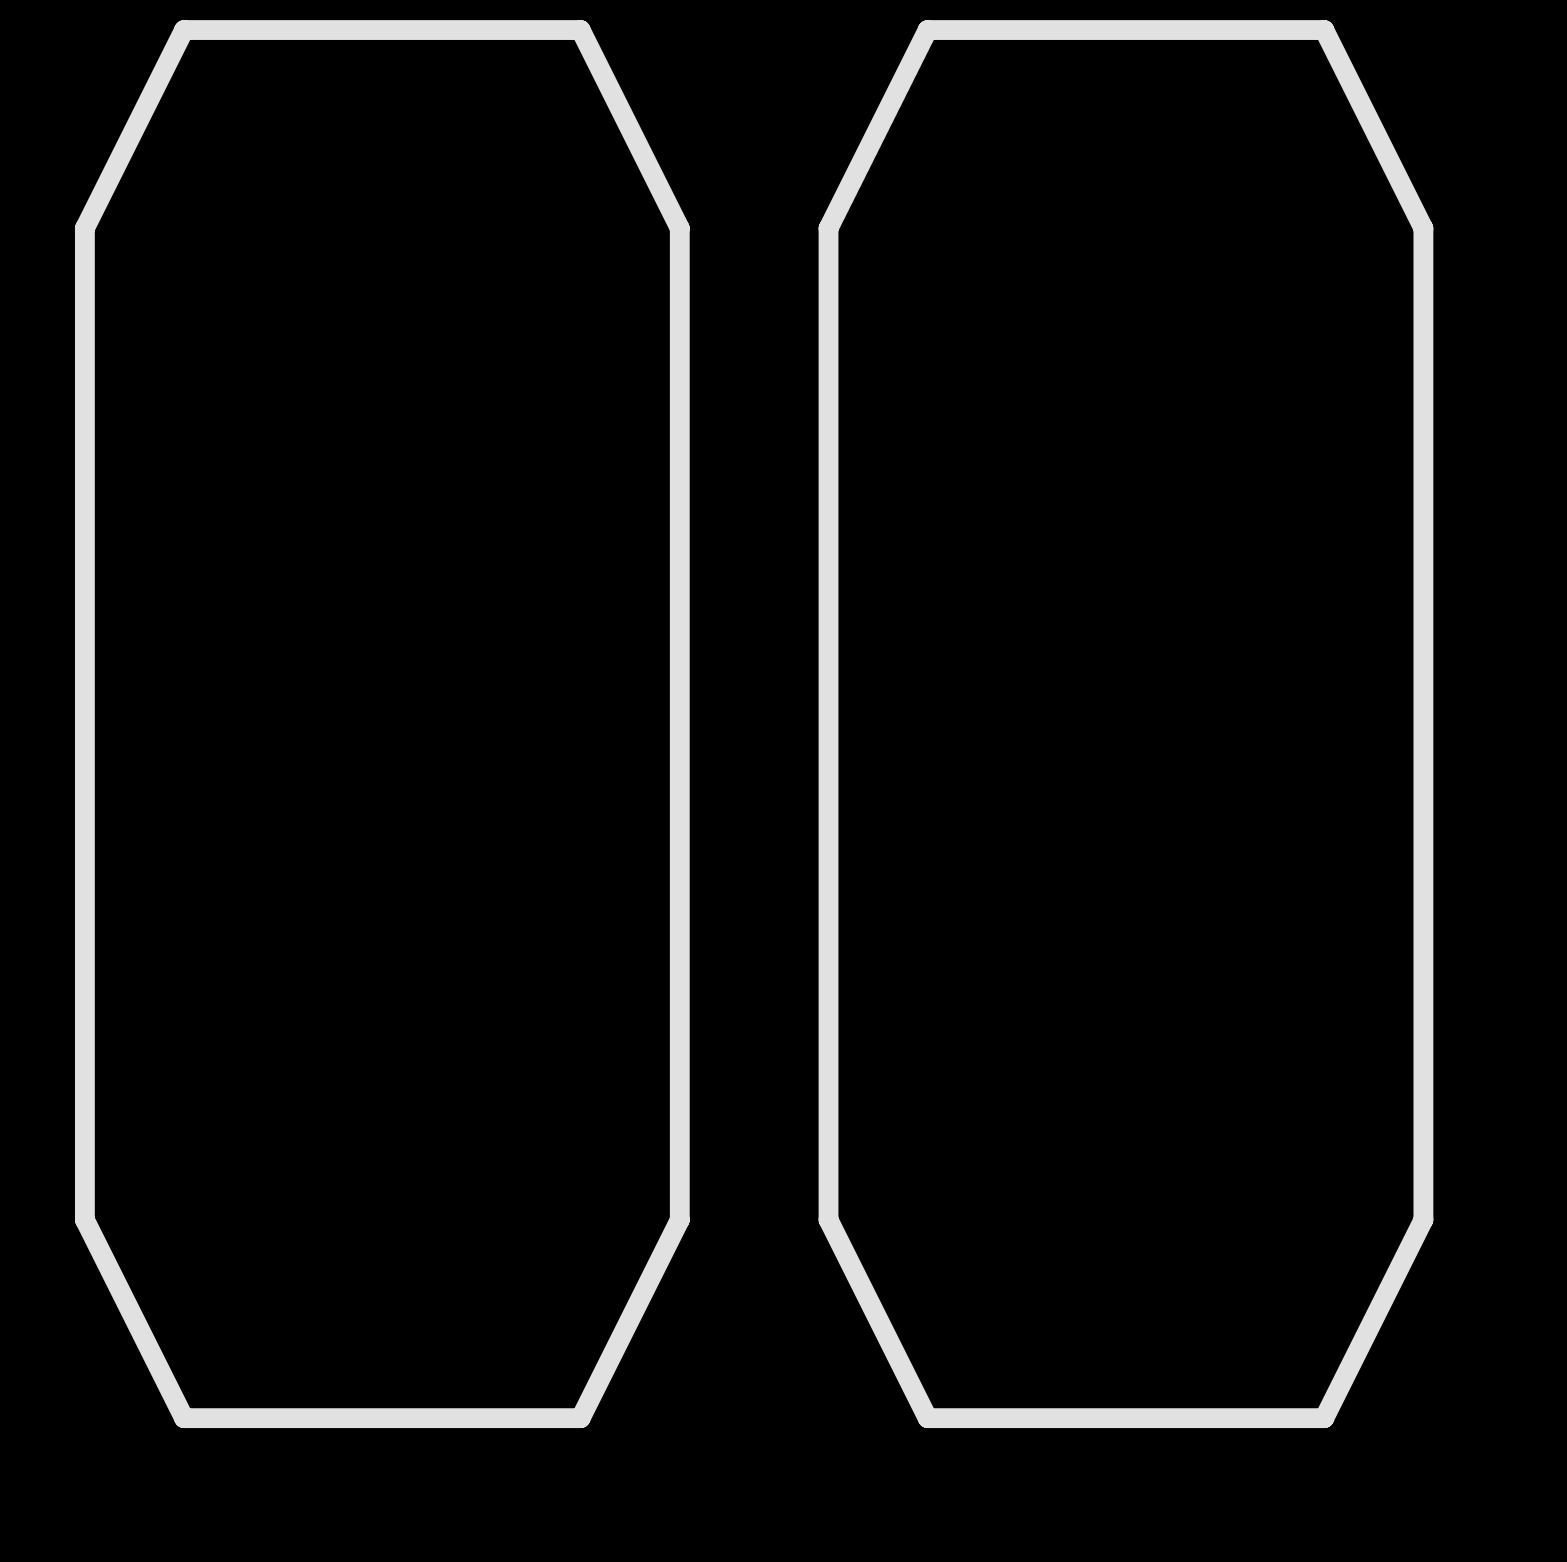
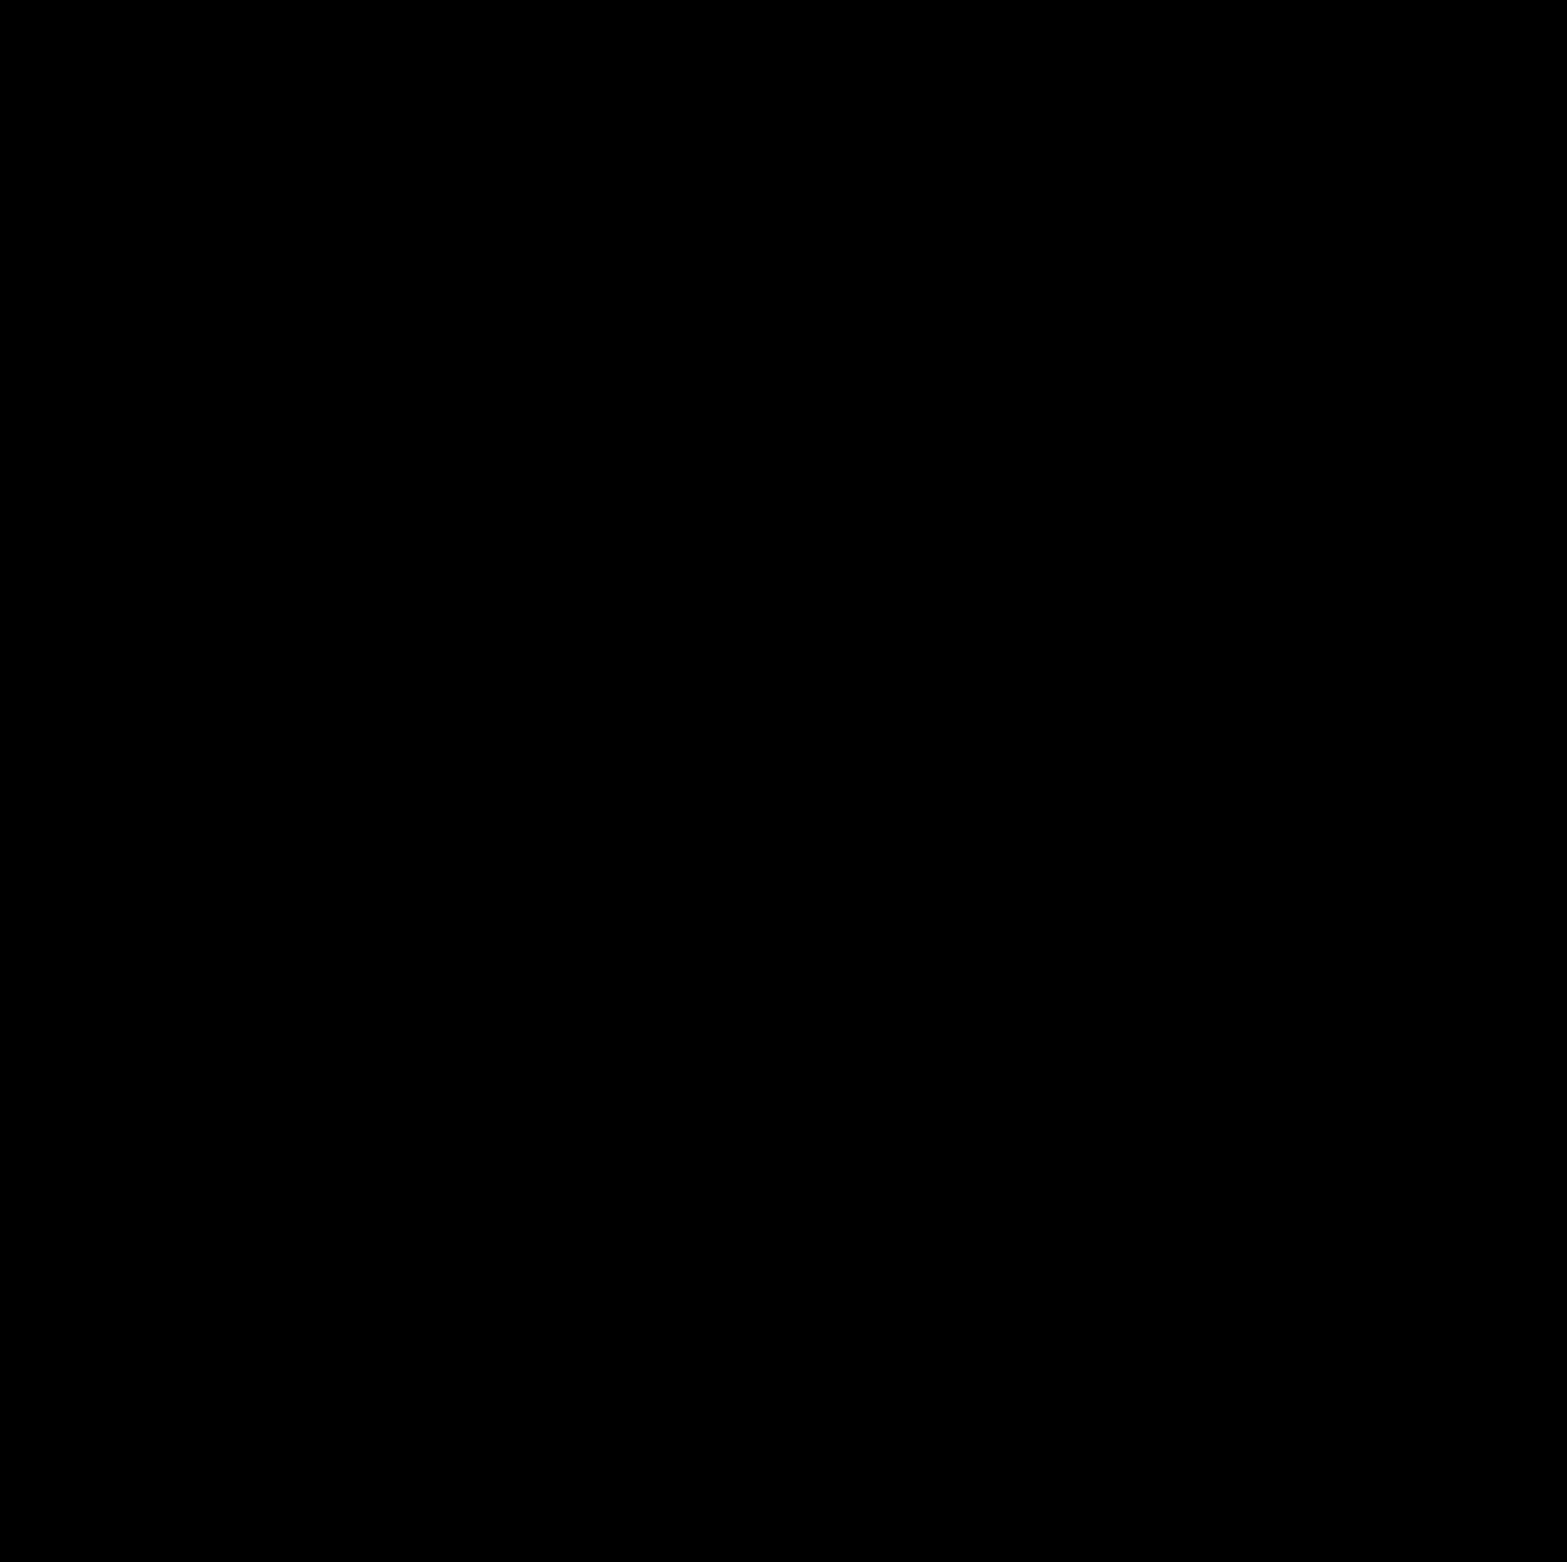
line: (184, 30) (580, 30) (679, 228) (679, 1219) (580, 1418) (184, 1418) (84, 1219) (84, 228) (184, 30) -> none
line: (927, 30) (1324, 30) (1423, 228) (1423, 1219) (1324, 1418) (927, 1418) (828, 1219) (828, 228) (927, 30) -> none

